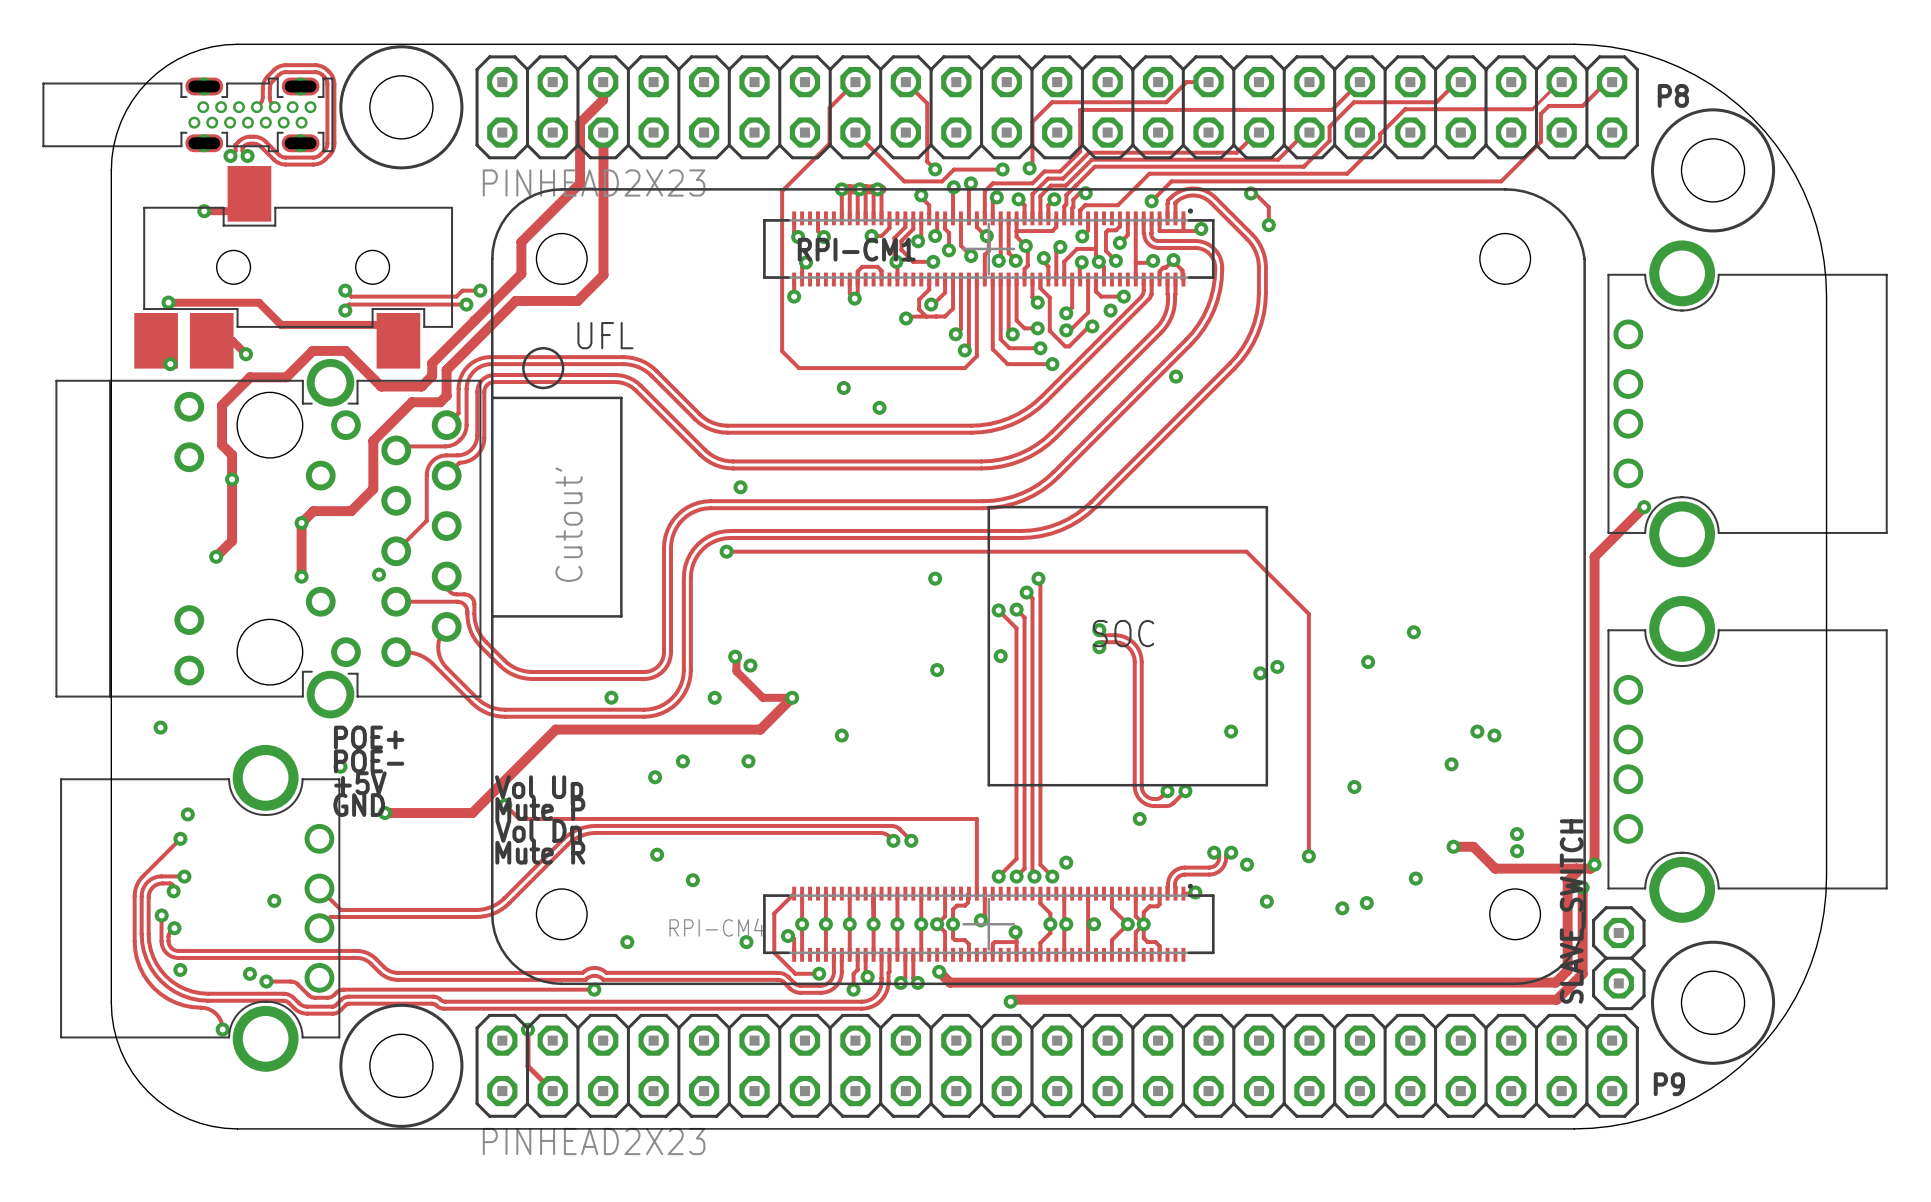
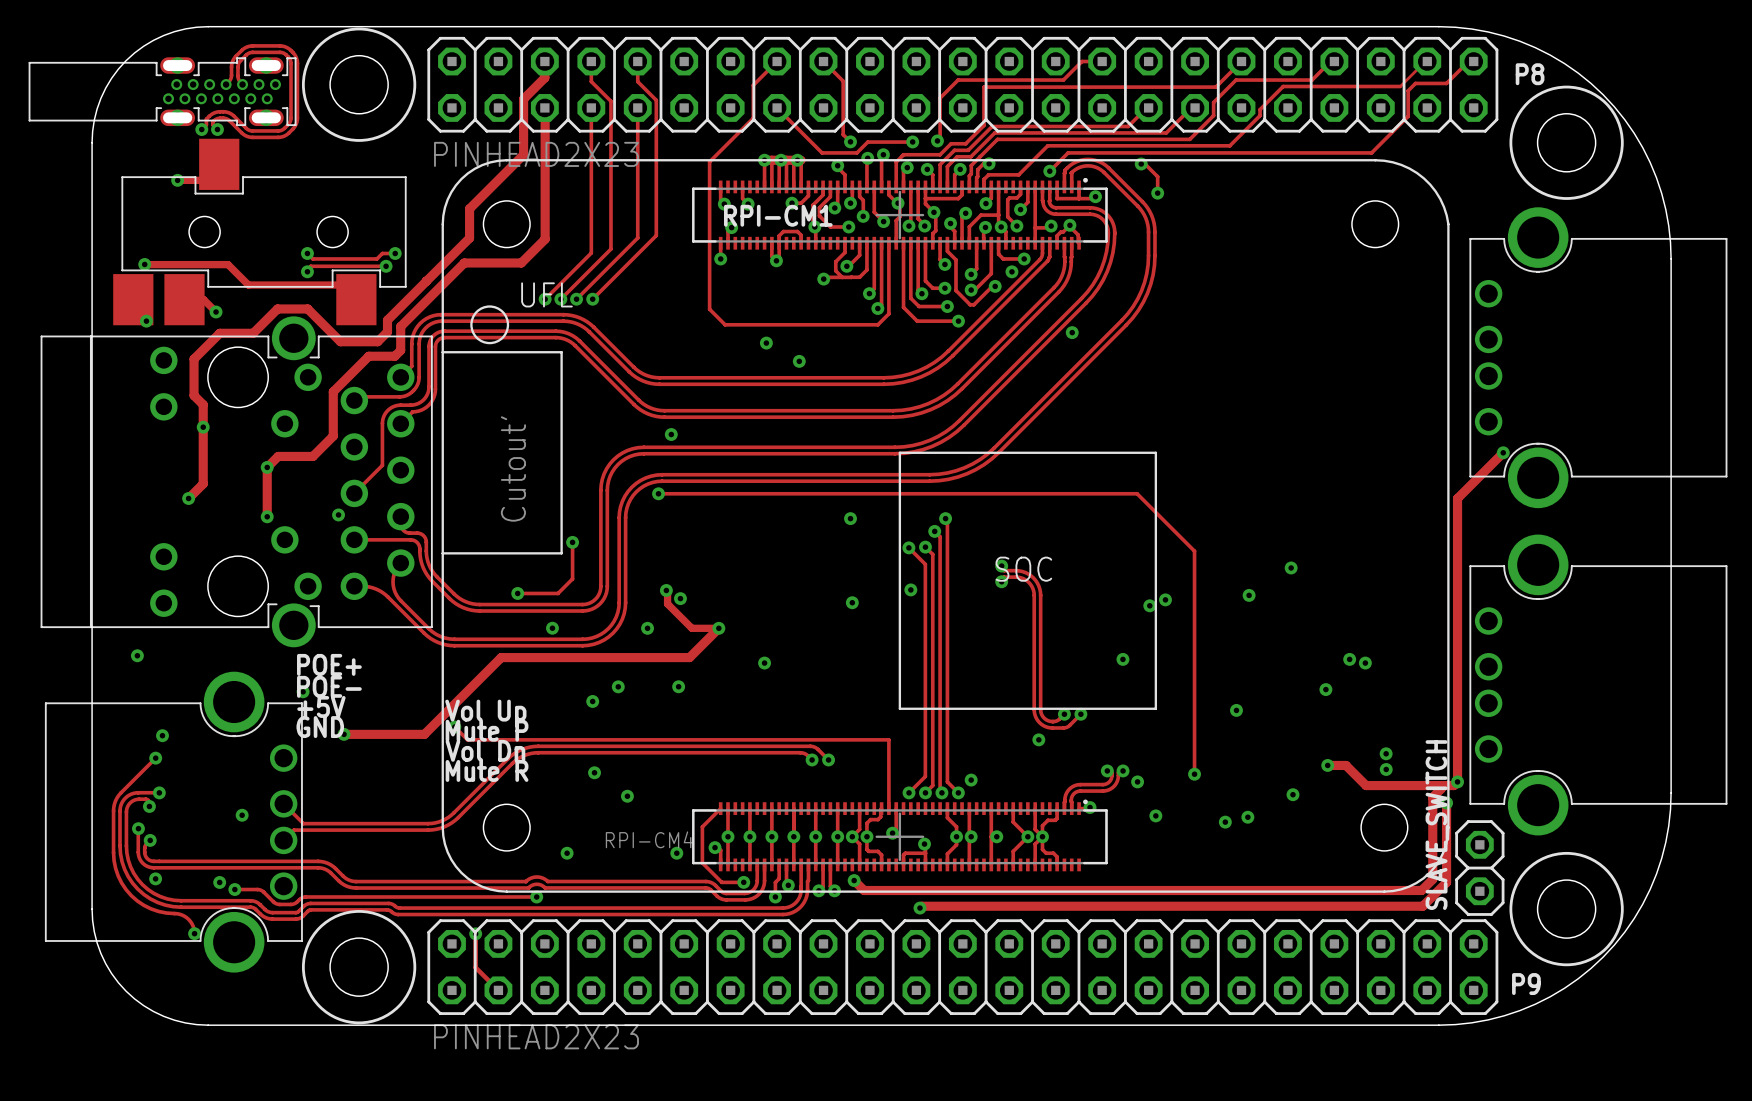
track: none -> (591, 61) (591, 81) (610, 101) (610, 249) (560, 299)
track: none -> (637, 61) (637, 81) (656, 100) (656, 235) (592, 299)
track: none -> (591, 107) (591, 253) (545, 299)
track: none -> (637, 107) (637, 238) (576, 299)
via: none -> (395, 253)
track: (480, 290) (462, 290) (456, 296) (420, 296) -> (395, 253) (382, 253) (376, 258)
via: (480, 290) -> none
track: (430, 304) (466, 304) -> none
via: none -> (386, 266)
via: (466, 304) -> none
via: none -> (545, 299)
via: none -> (560, 299)
via: none -> (576, 299)
via: none -> (592, 299)
track: none -> (572, 542) (572, 578) (558, 593) (517, 593)
via: none -> (572, 542)
via: none -> (517, 593)

